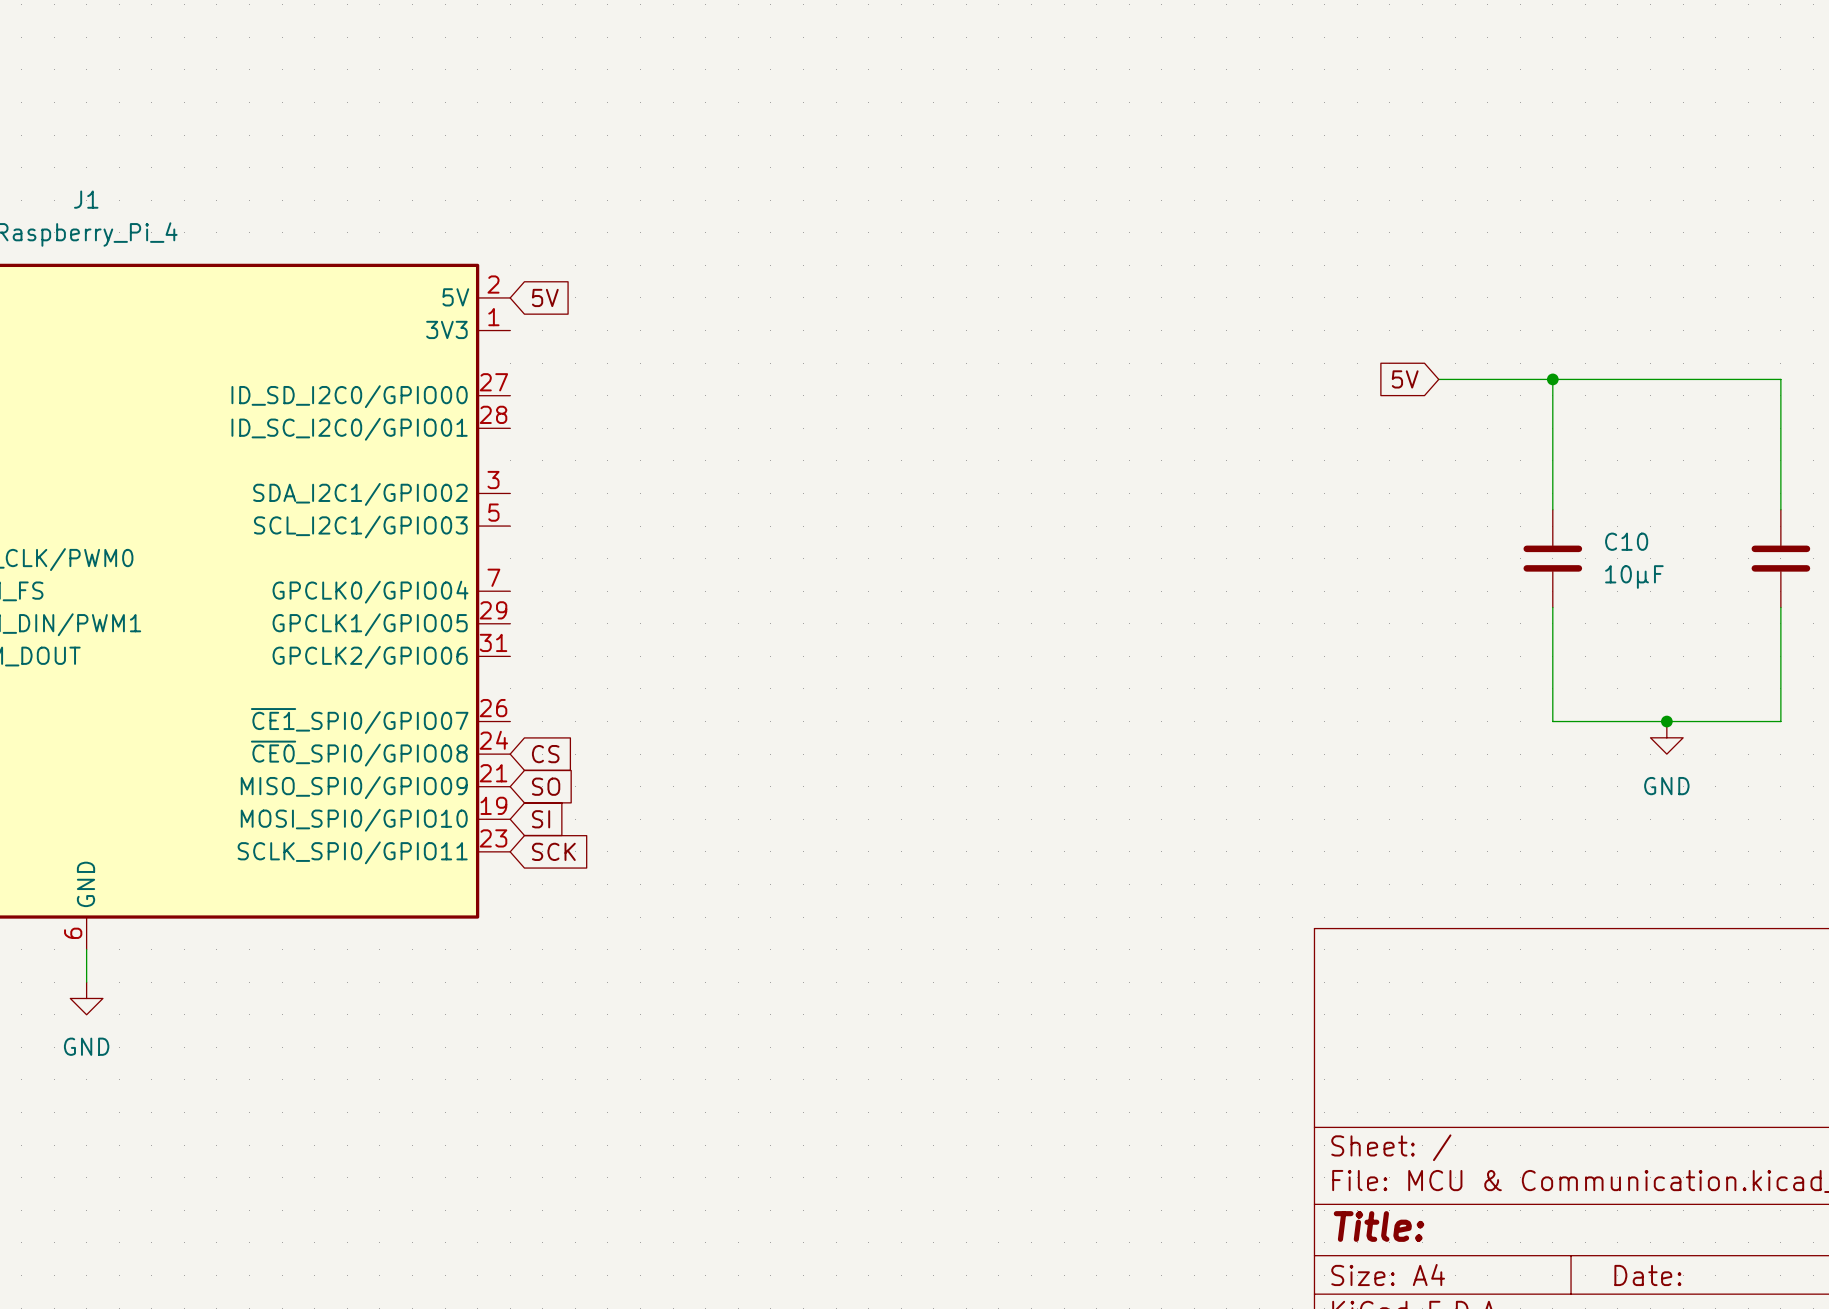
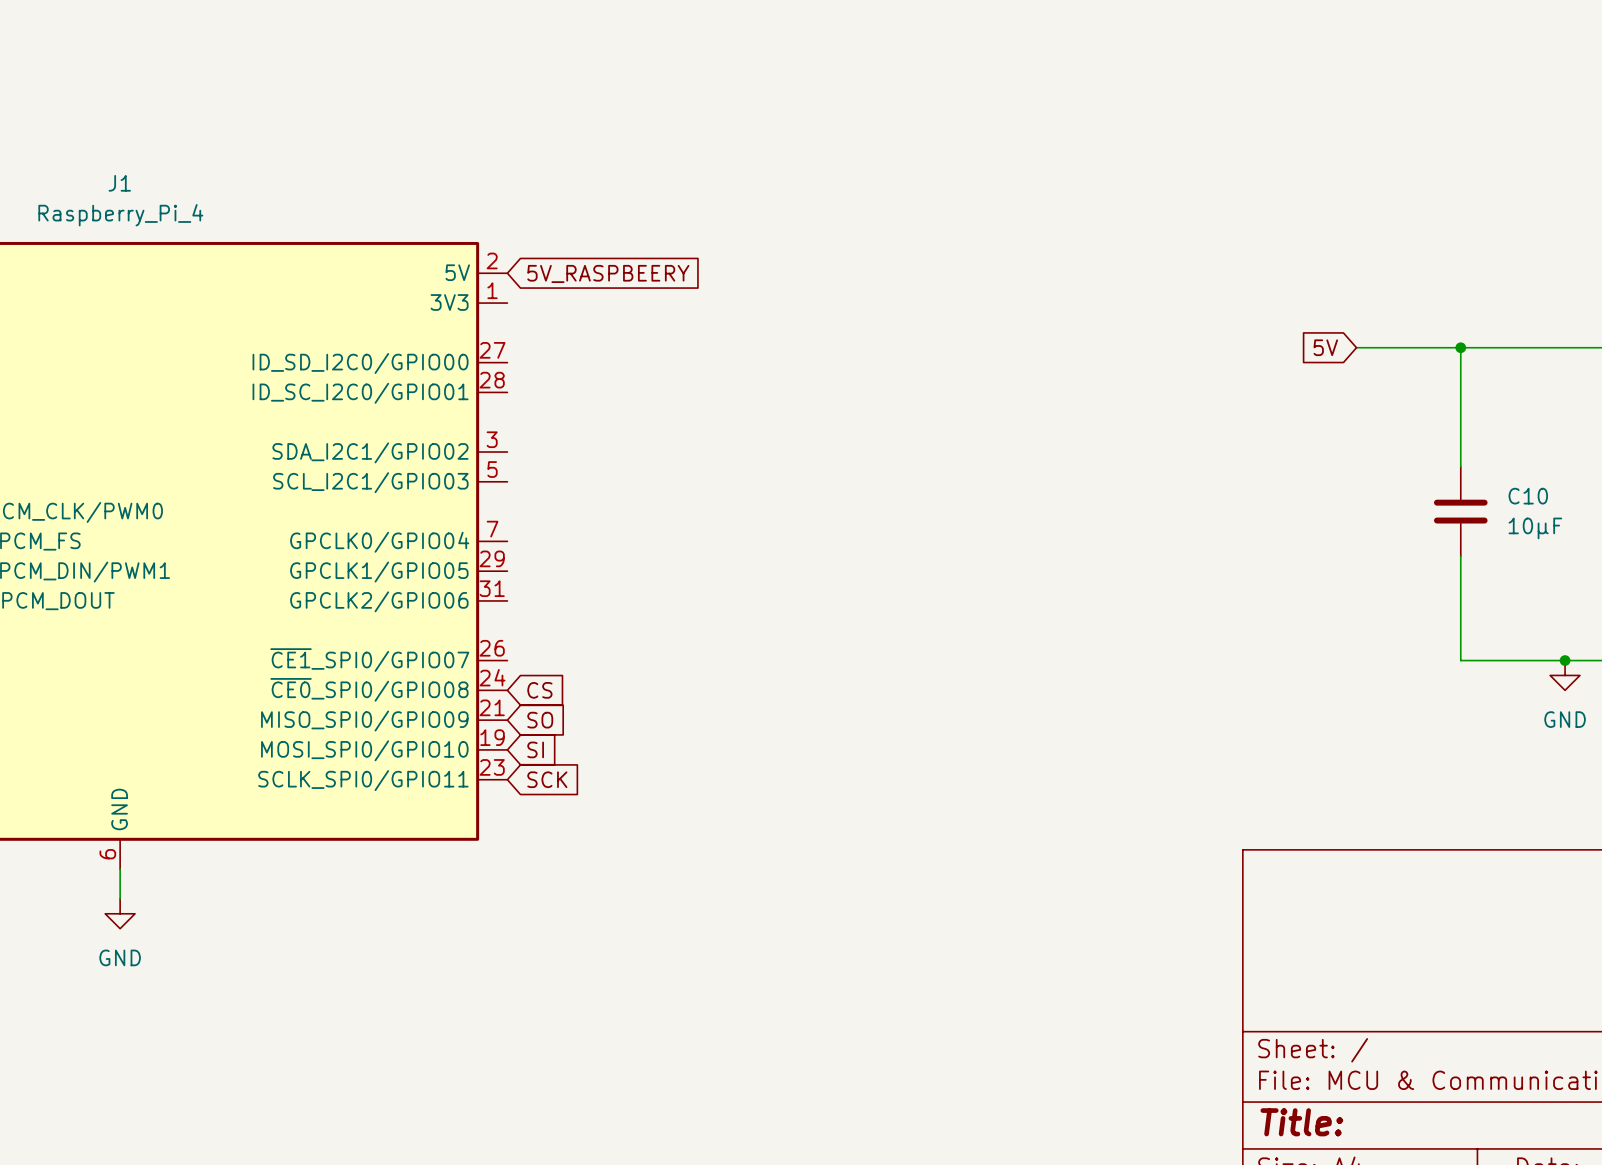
global label: 5V (545, 297) -> 5V_RASPBEERY (608, 273)

